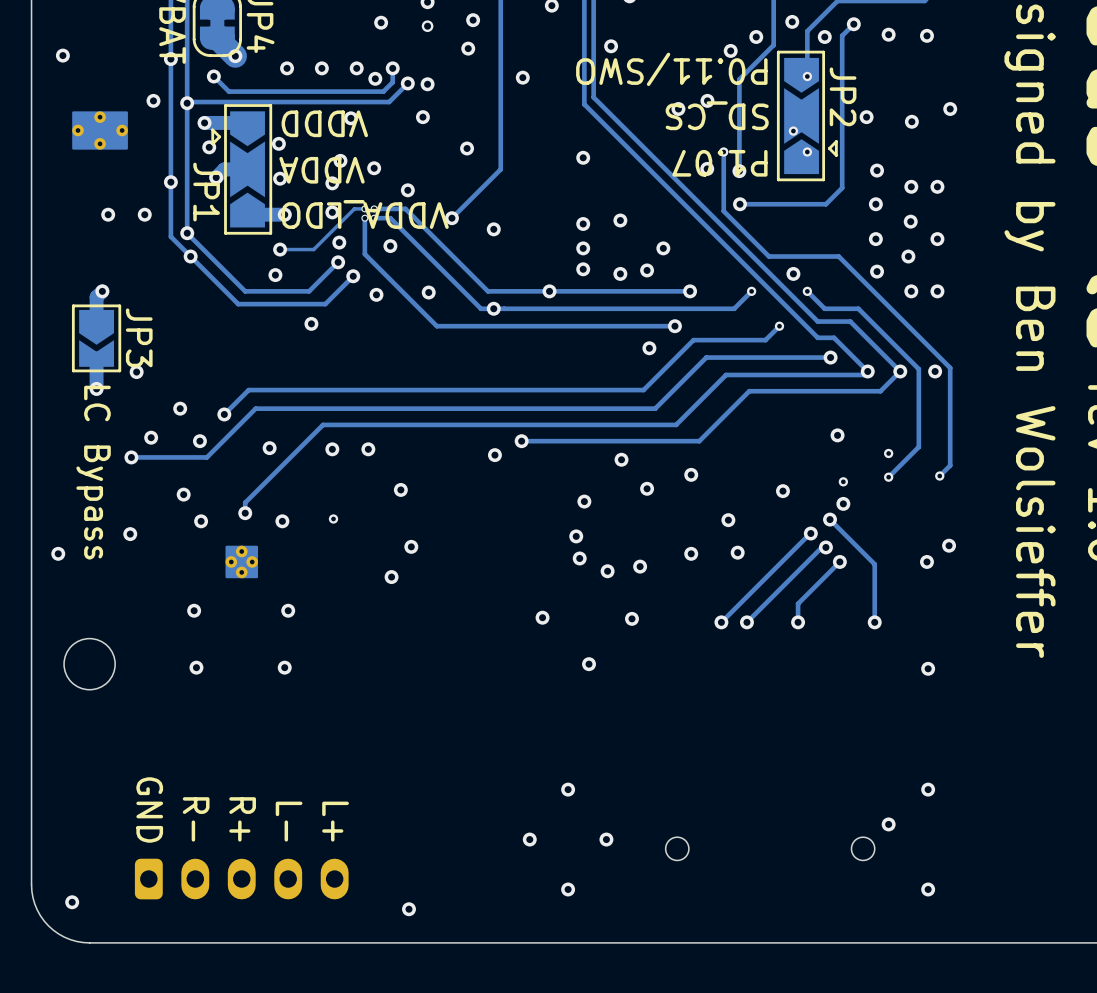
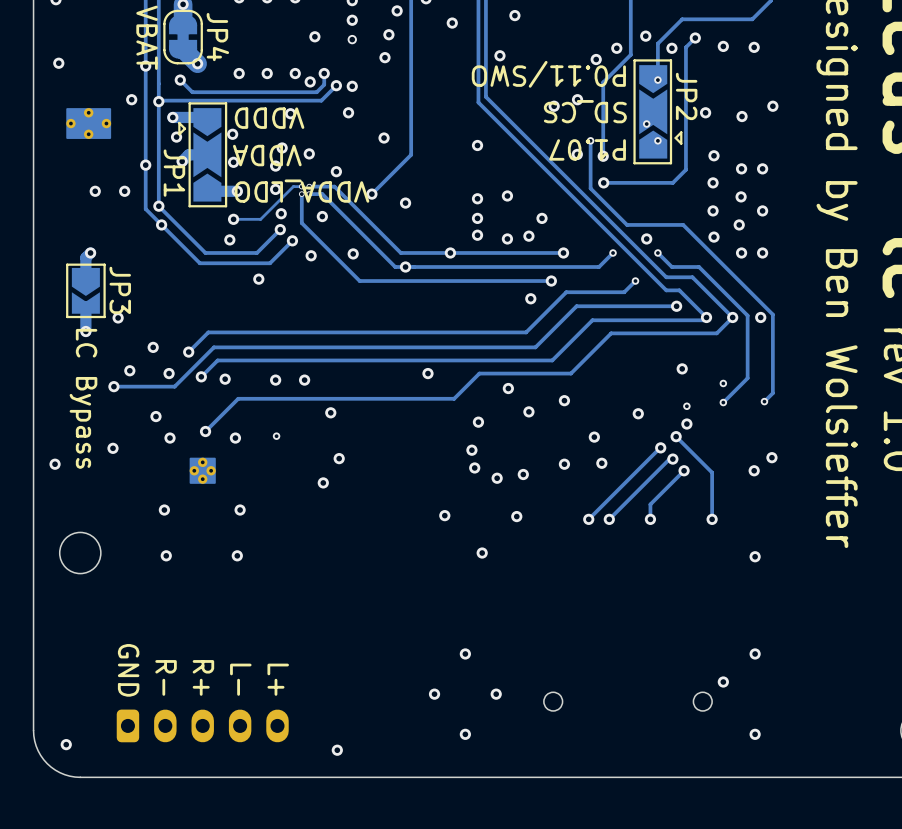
via: (522, 77) -> none
track: (323, 424) (245, 502) (245, 513) -> (268, 360) (217, 360) (201, 376)
track: (585, 441) (521, 441) -> (479, 373) (454, 398) (238, 398) (205, 431)
via: none -> (201, 376)
via: (494, 455) -> none

